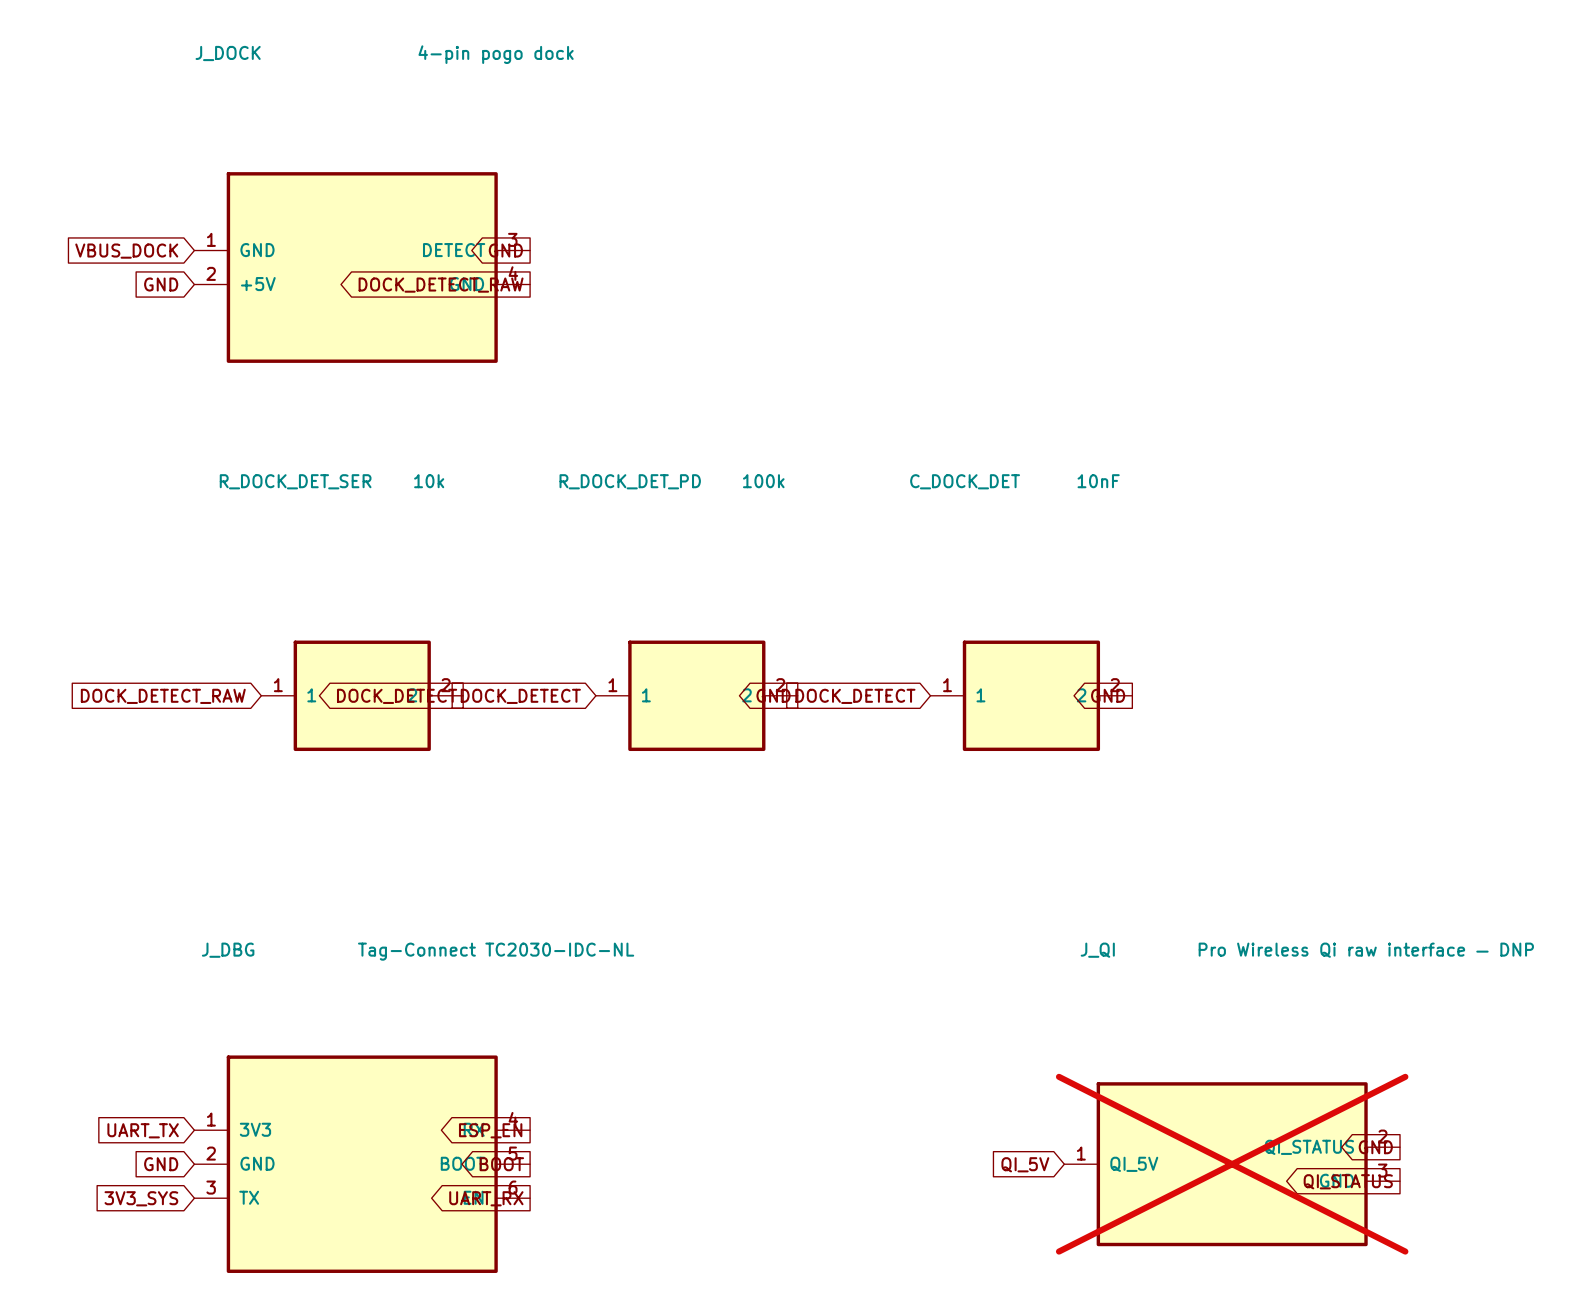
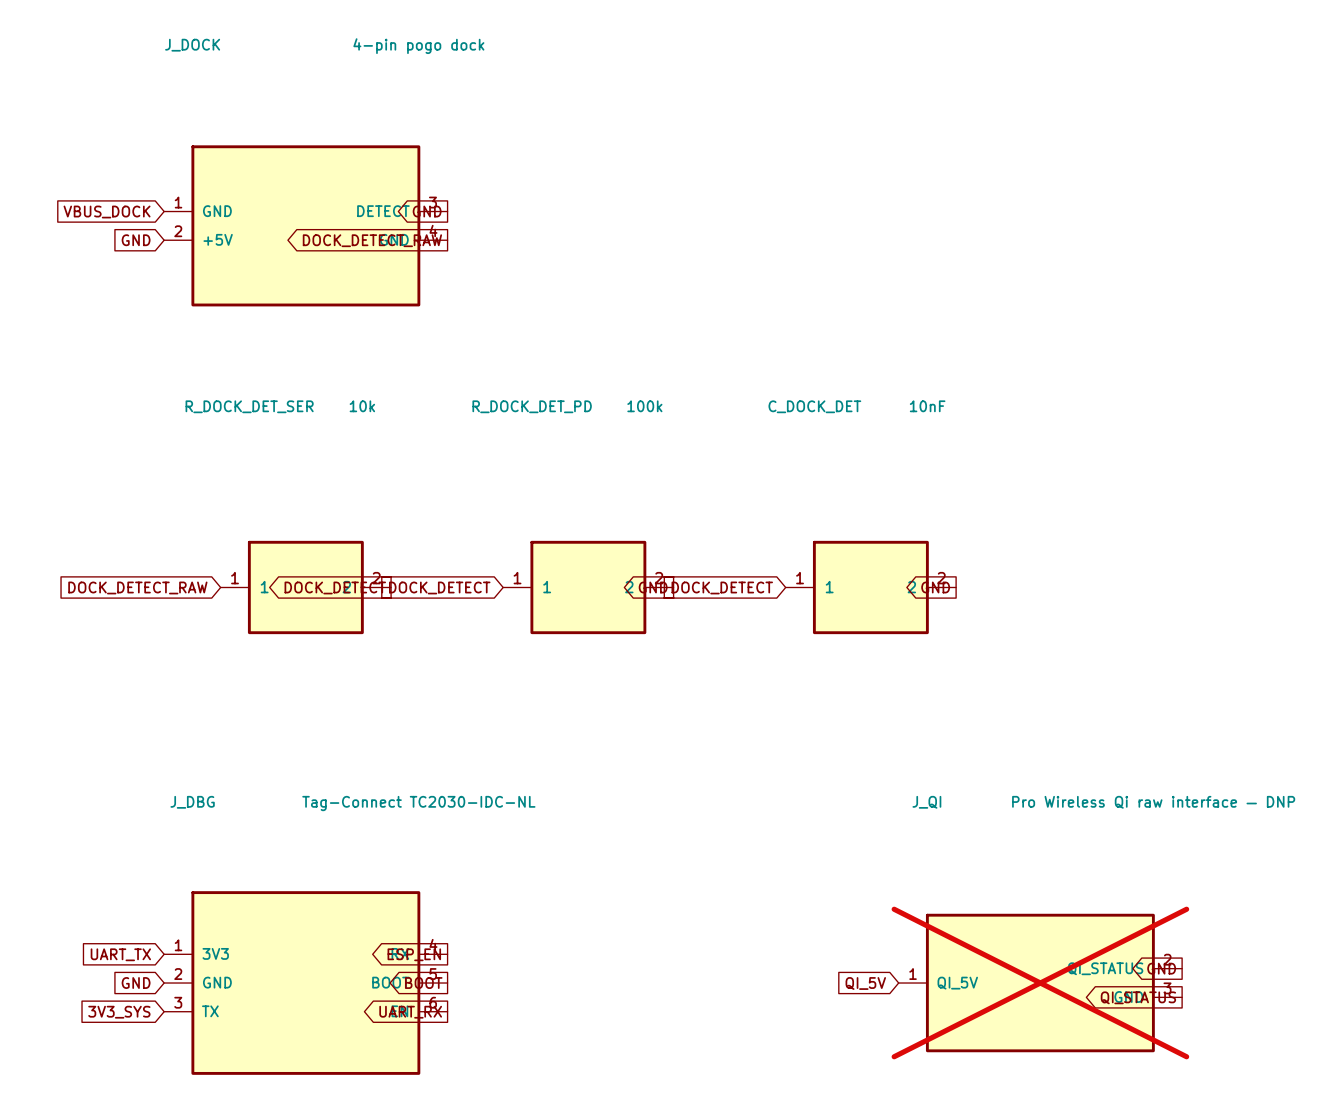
R_DOCK_DET_SER symbol: [261, 640, 464, 752] -> [220, 540, 392, 635]
R_DOCK_DET_PD symbol: [595, 640, 798, 752] -> [503, 540, 674, 635]
C_DOCK_DET symbol: [930, 640, 1133, 752] -> [785, 540, 957, 635]

